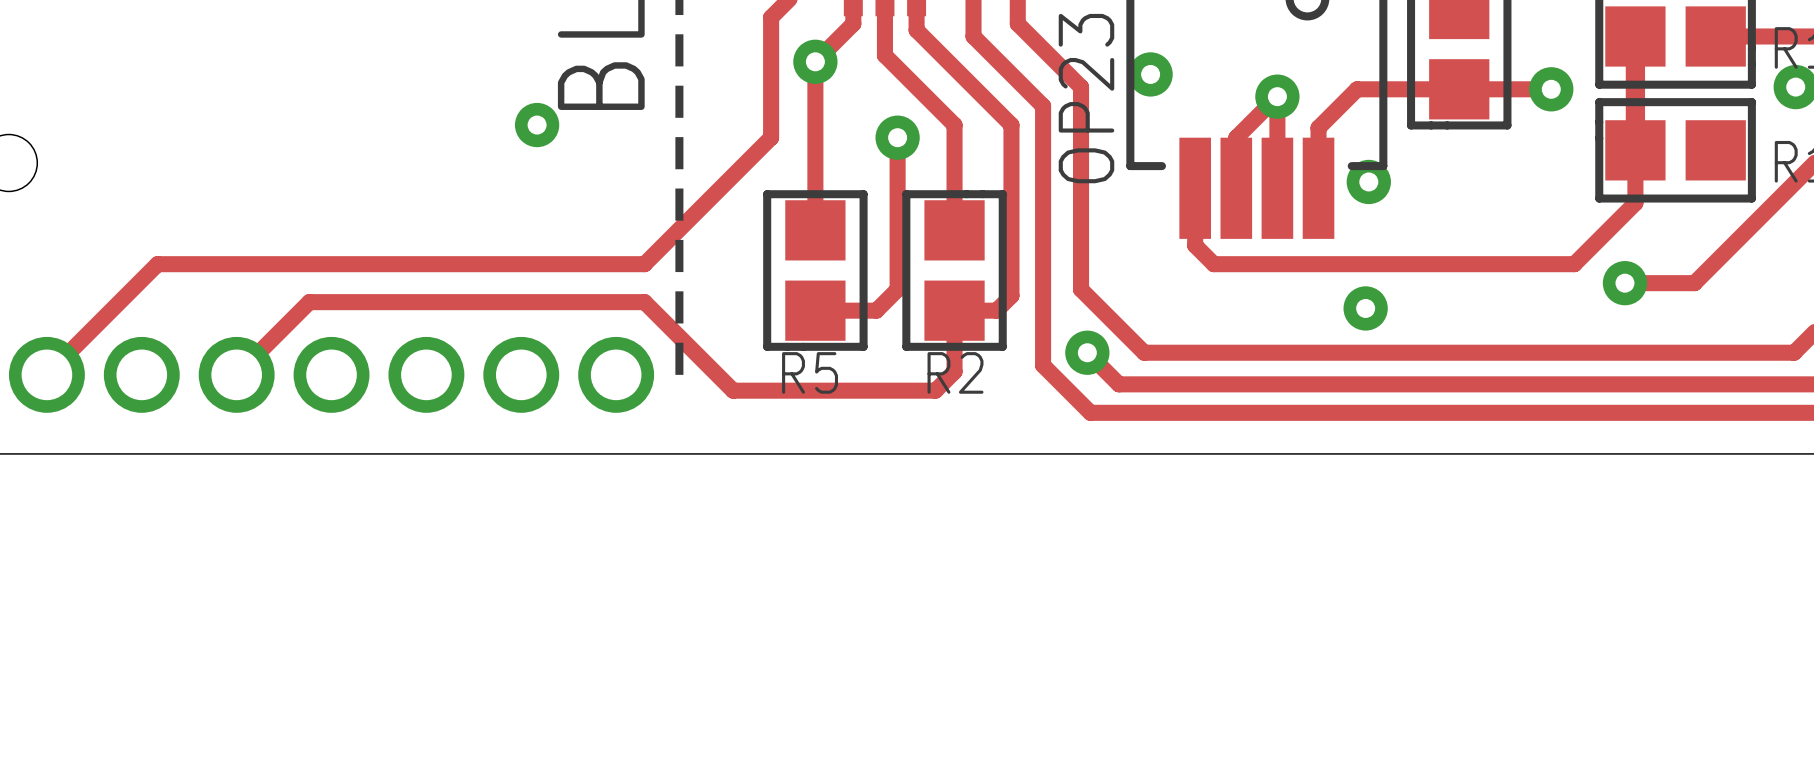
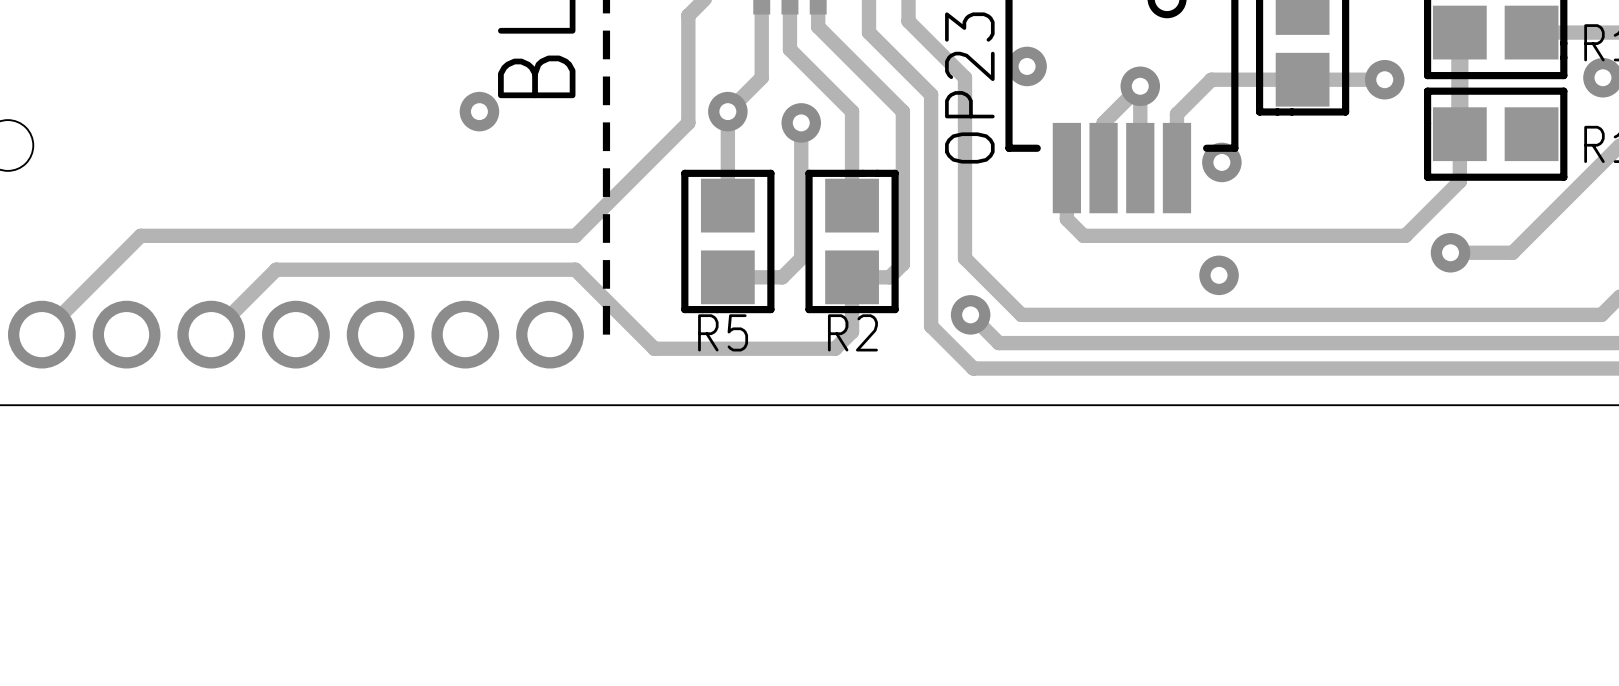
track: (853, 23) (815, 61) (815, 125) -> (761, 21) (761, 77) (727, 111)
via position: (815, 61) -> (727, 111)

